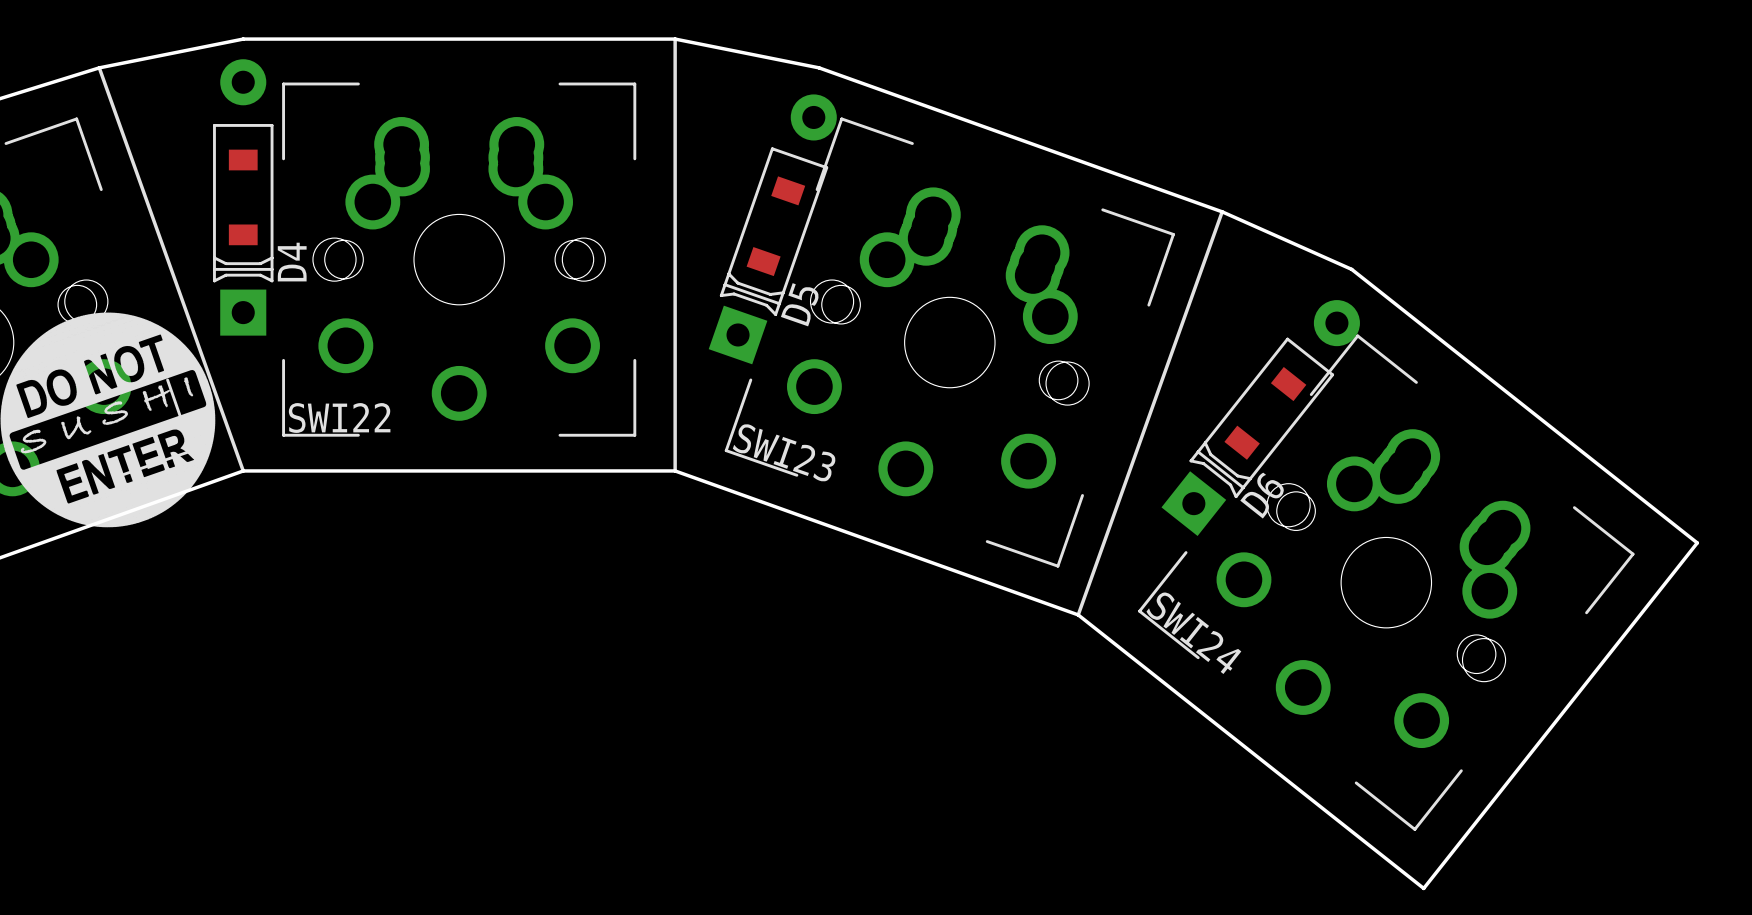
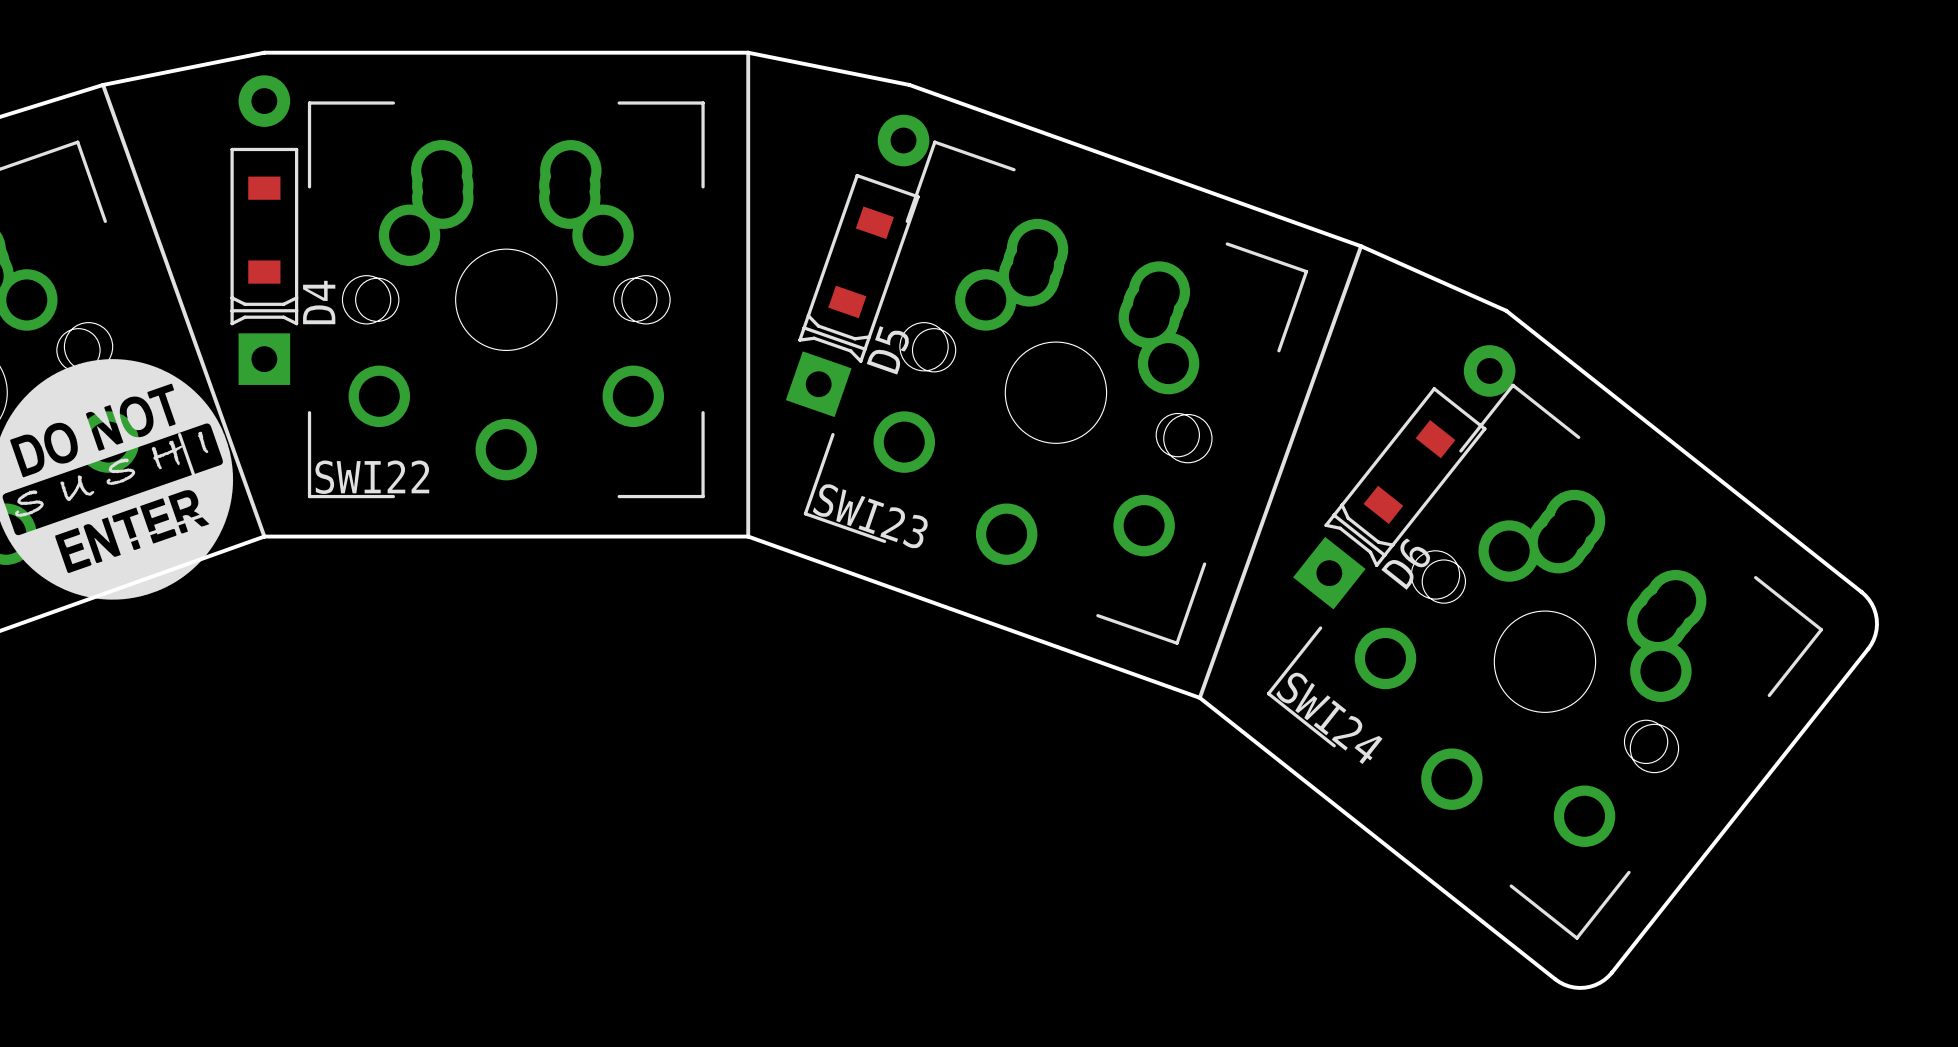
board edge: (1669, 520) (1697, 542) (1674, 571) -> (1861, 592) (1871, 604) (1876, 619) (1875, 634) (1868, 648)
board edge: (1446, 860) (1423, 888) (1395, 866) -> (1611, 972) (1599, 982) (1584, 987) (1569, 986) (1555, 979)

